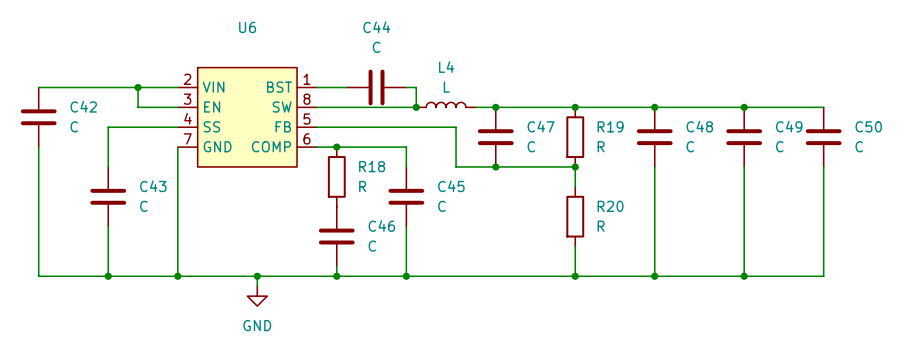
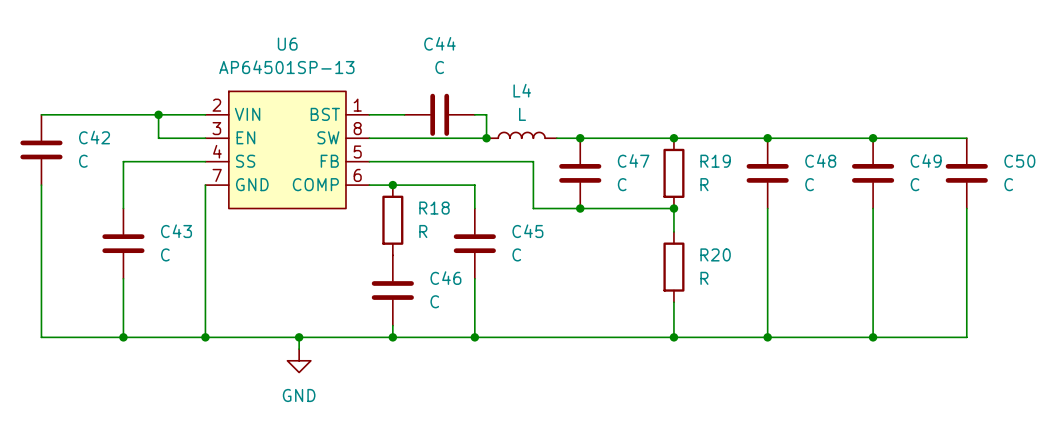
U6 value: none -> AP64501SP-13 (286, 67)

